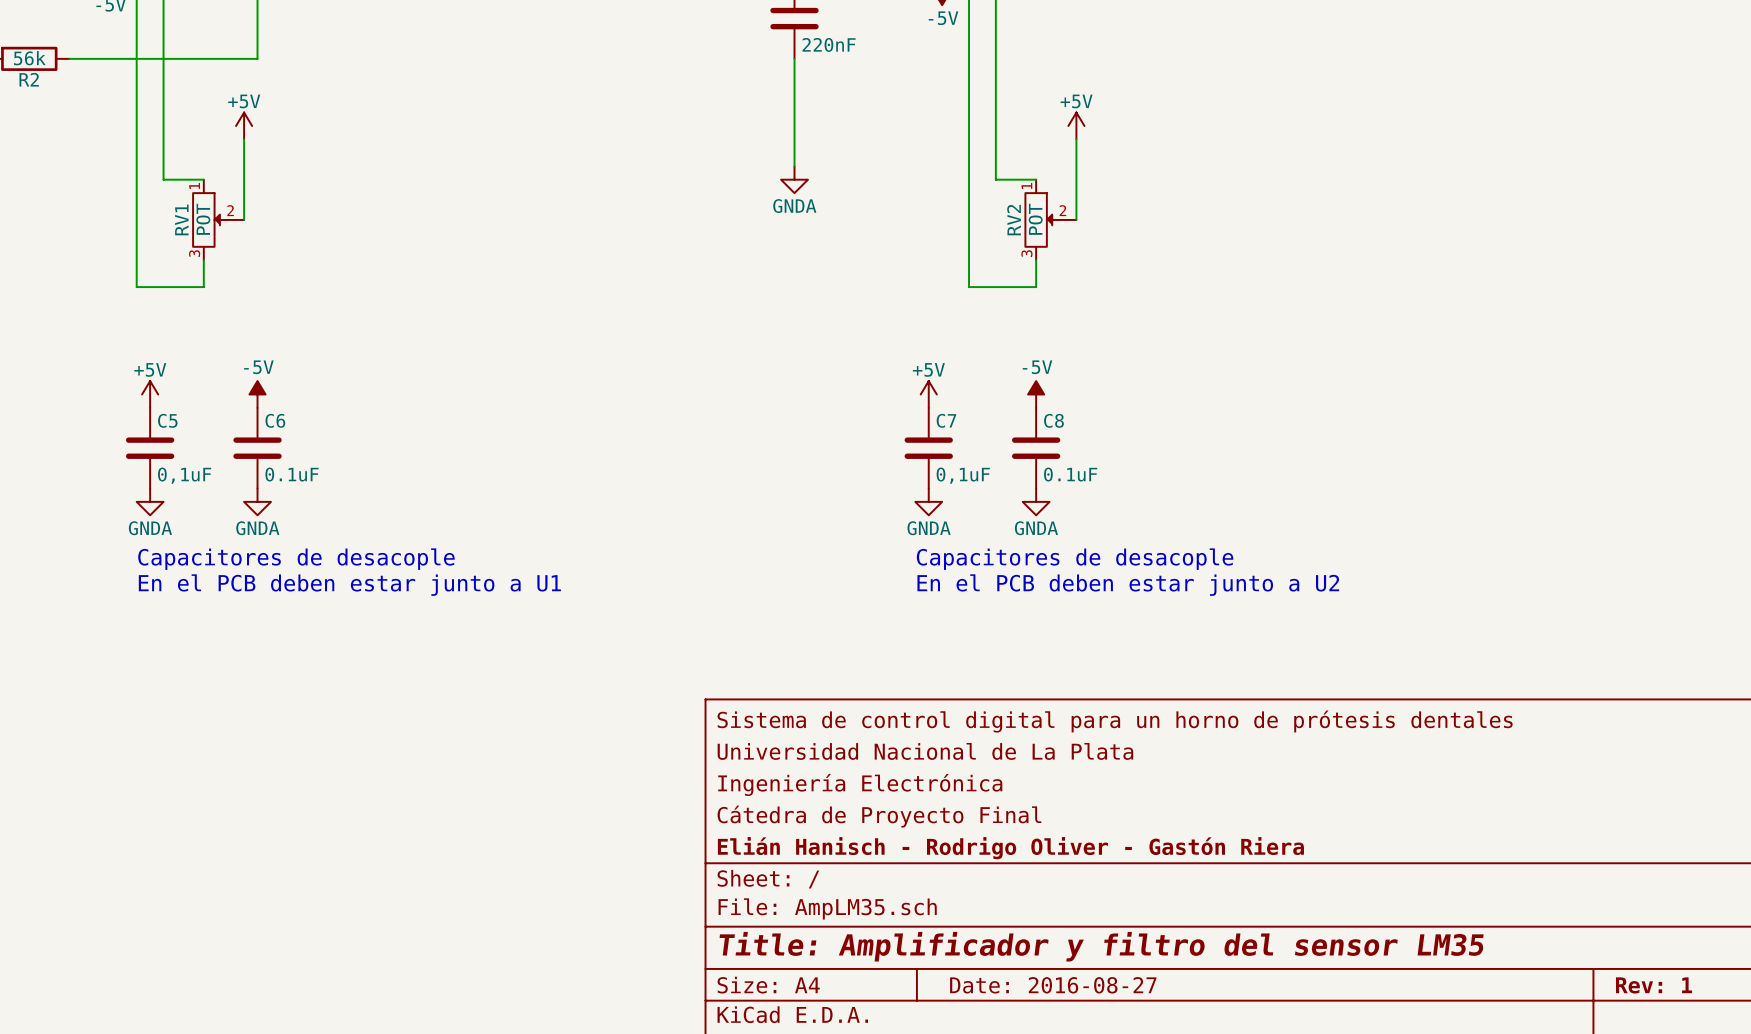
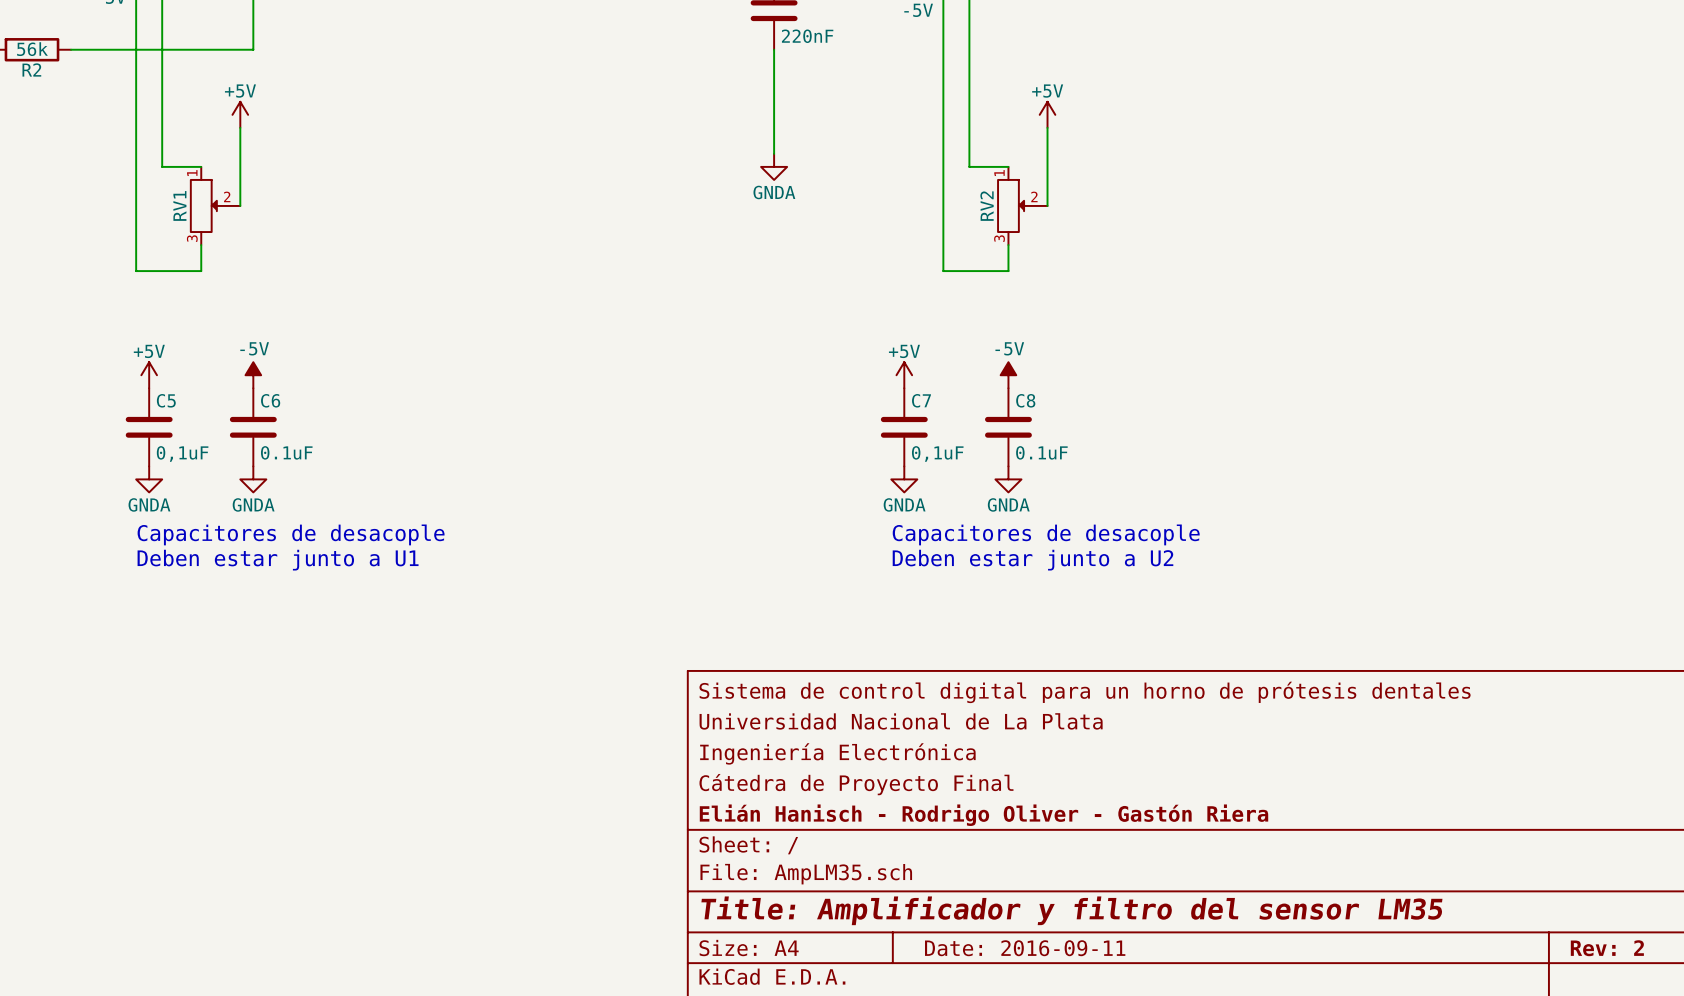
RV1 value: POT (203, 219) -> none
RV2 value: POT (1035, 219) -> none
text: En el PCB deben estar junto a U1 (349, 585) -> Deben estar junto a U1 (278, 560)
text: En el PCB deben estar junto a U2 (1128, 585) -> Deben estar junto a U2 (1033, 560)
title block: Date: 2016-08-27 (1053, 985) -> Date: 2016-09-11 (1025, 948)
title block: Rev: 1 (1654, 985) -> Rev: 2 (1607, 948)

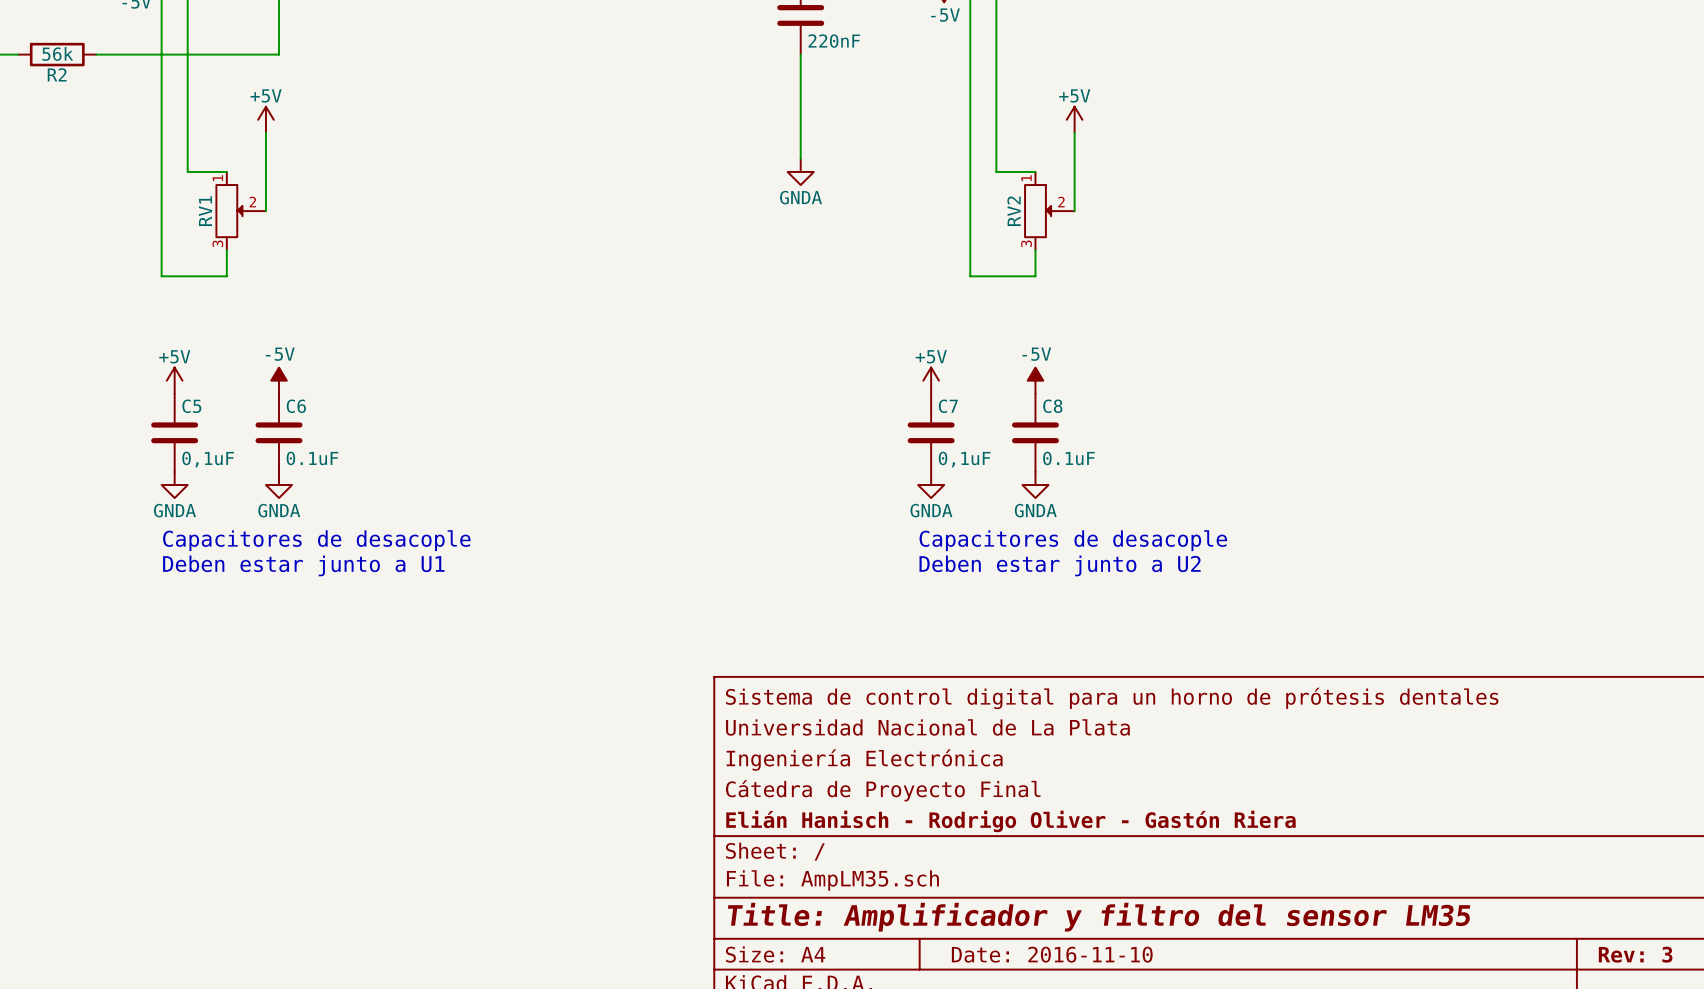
title block: Date: 2016-09-11 (1025, 948) -> Date: 2016-11-10 (1052, 954)
title block: Rev: 2 (1607, 948) -> Rev: 3 (1635, 954)

